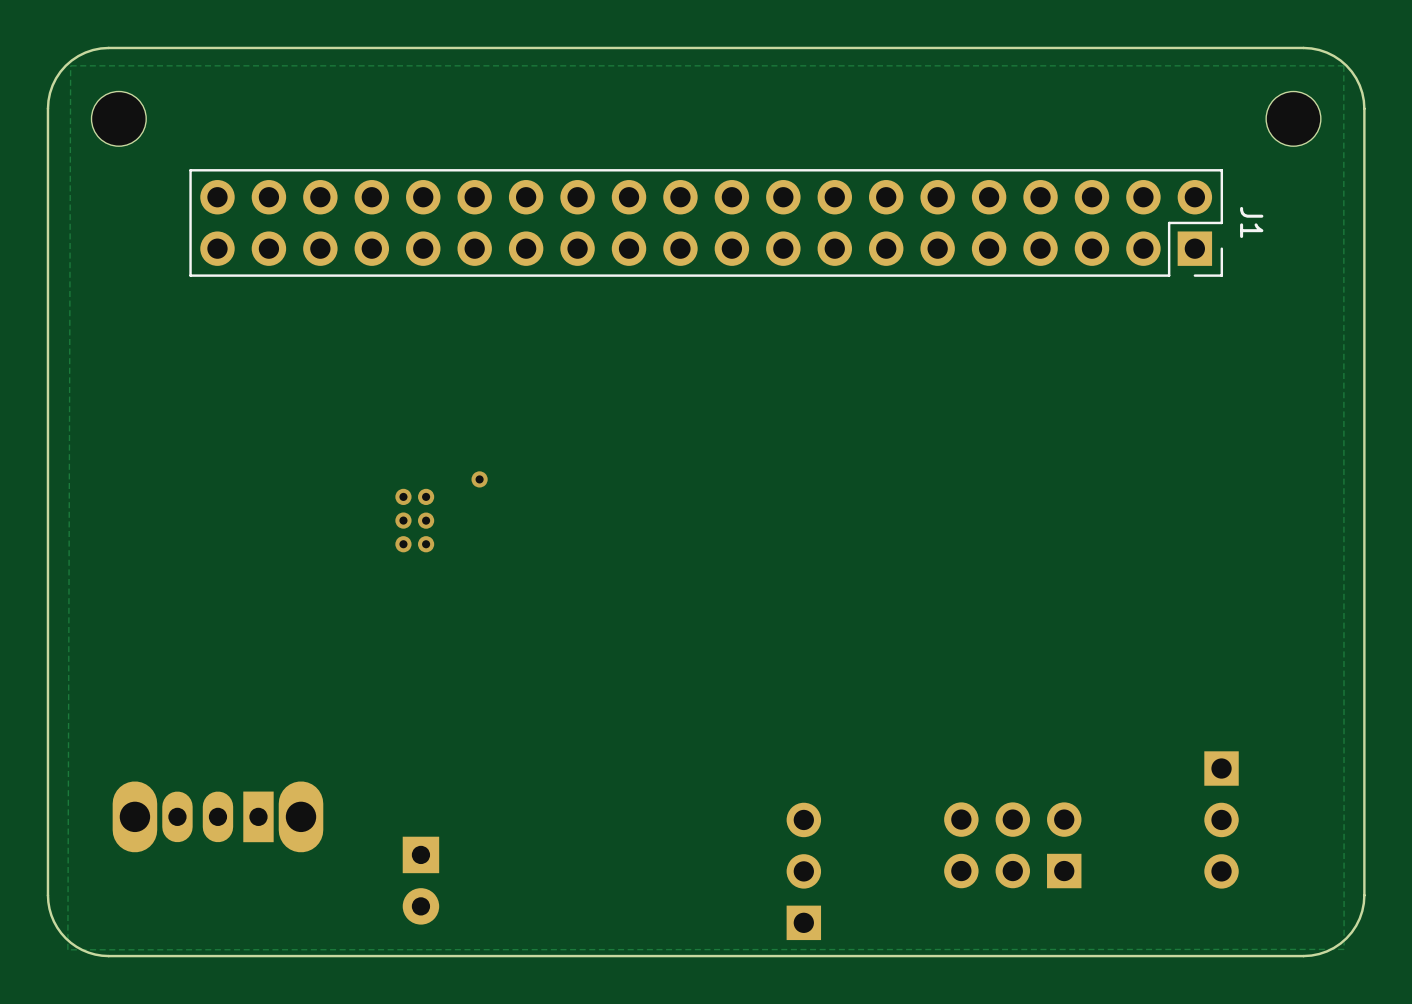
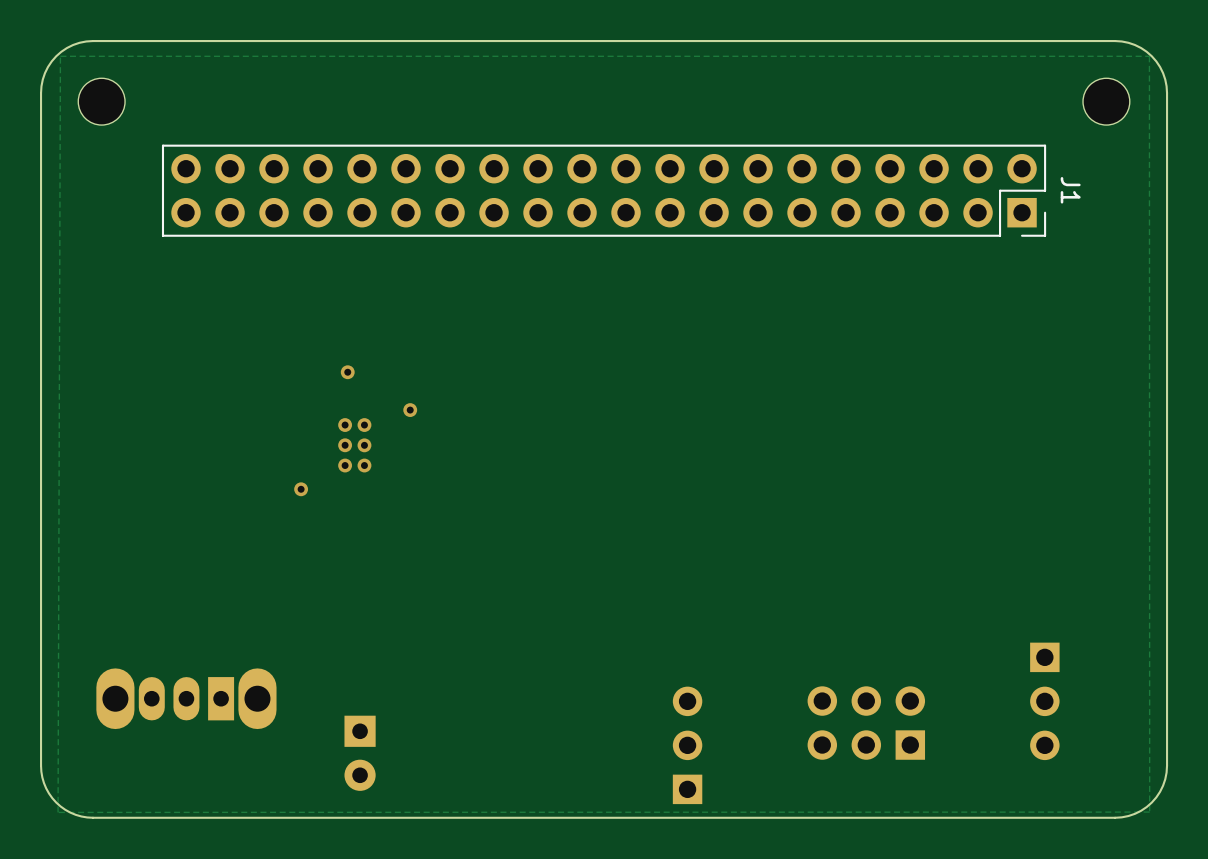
via: none -> (347, 372)
via: none -> (301, 489)

